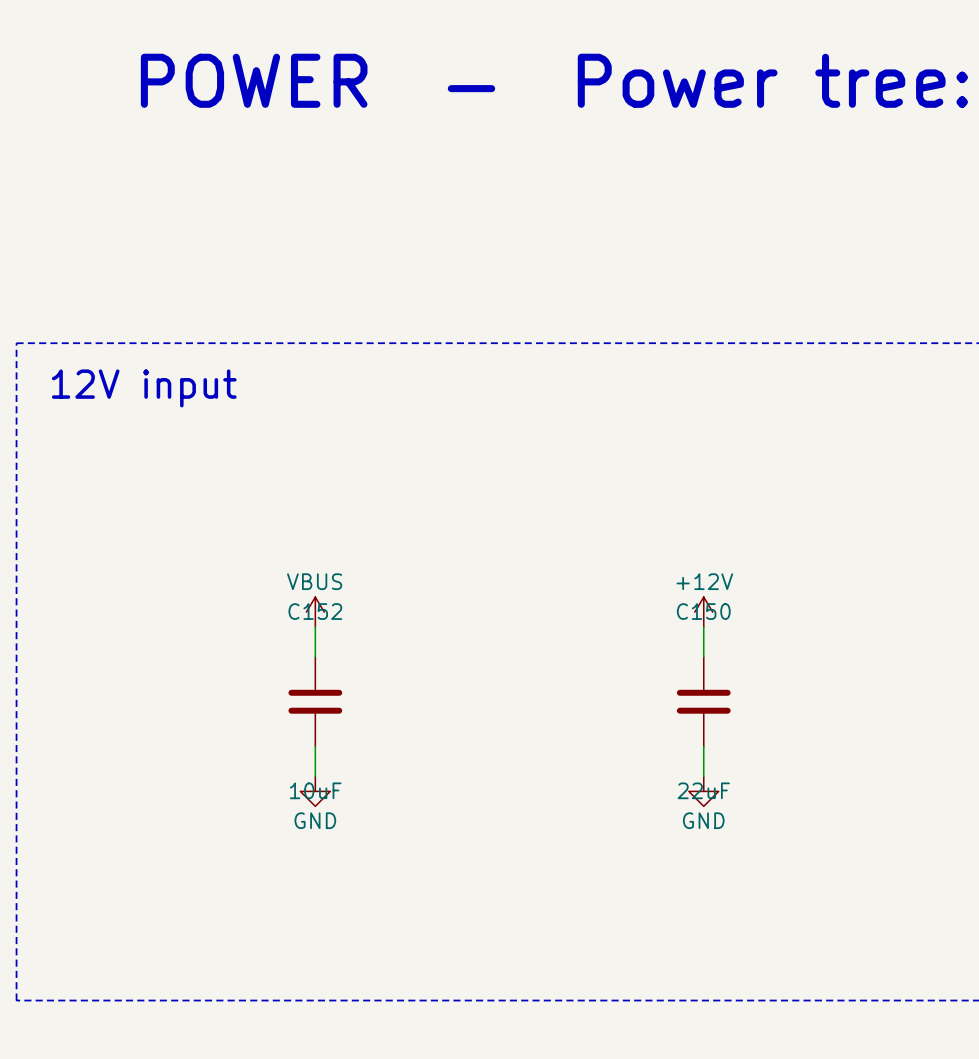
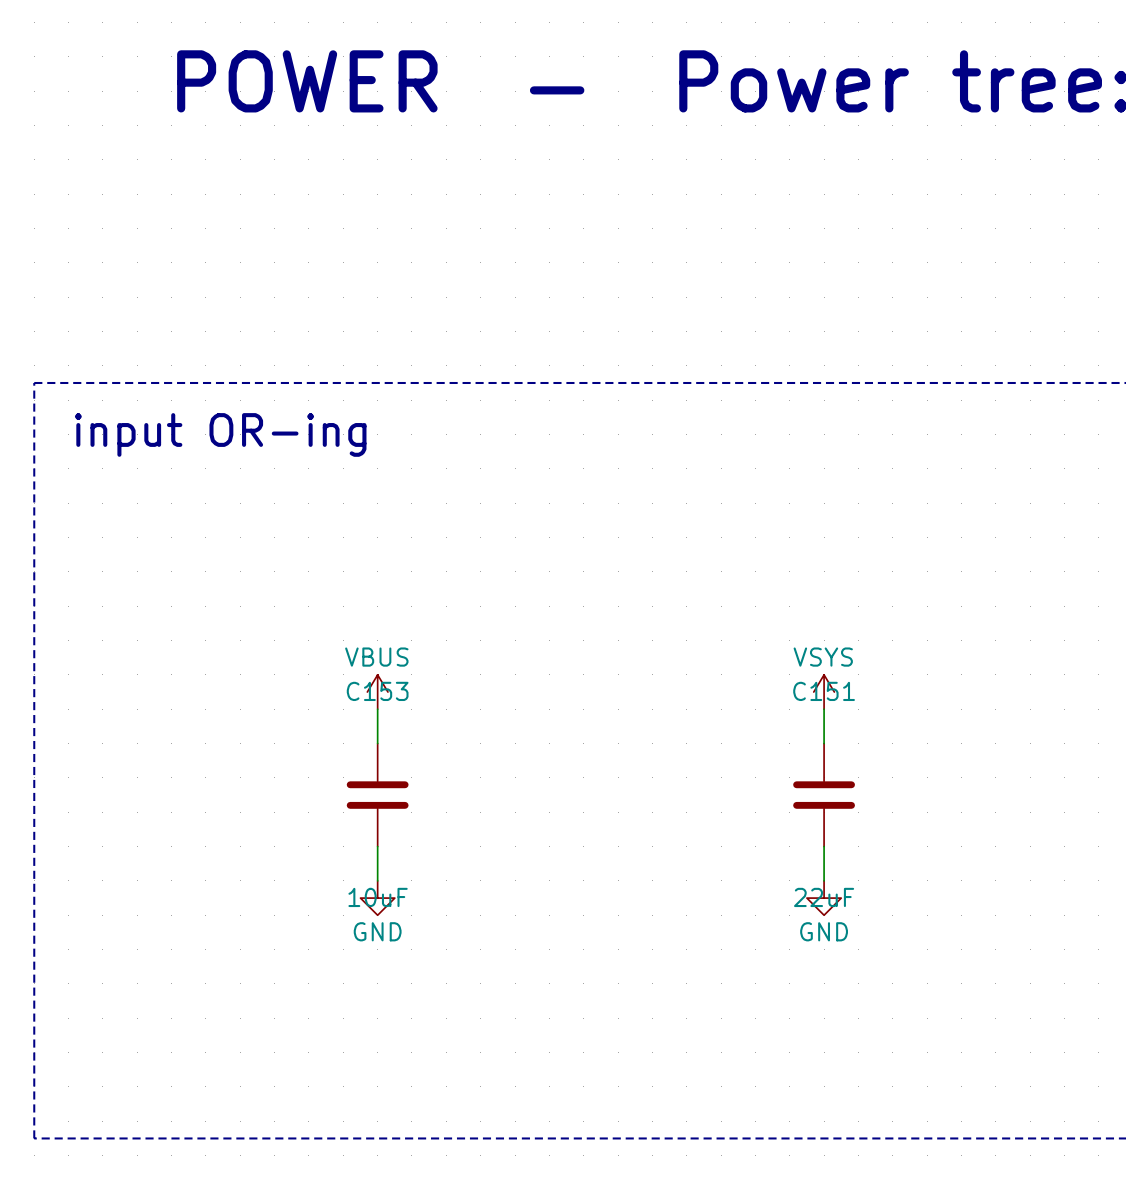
text: 12V input (144, 388) -> input OR-ing (220, 434)
C152 name: C152 (315, 611) -> C153 (377, 691)
C150 name: C150 (703, 611) -> C151 (824, 691)
power symbol: +12V (703, 612) -> VSYS (824, 692)

